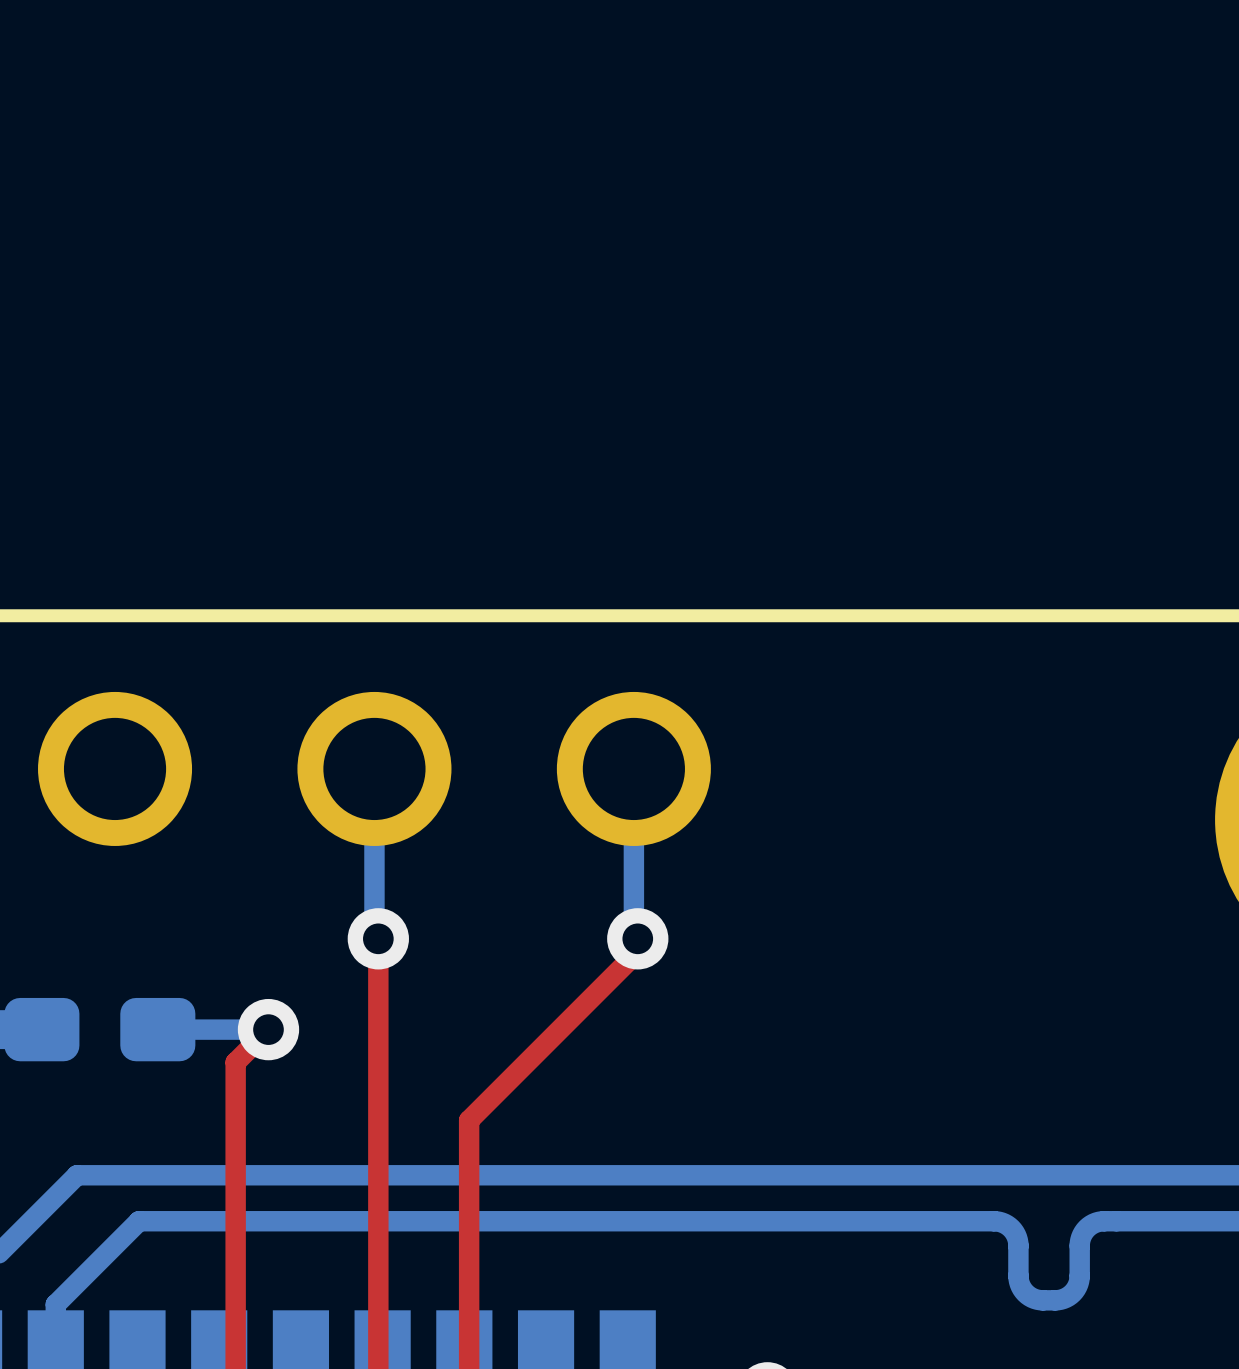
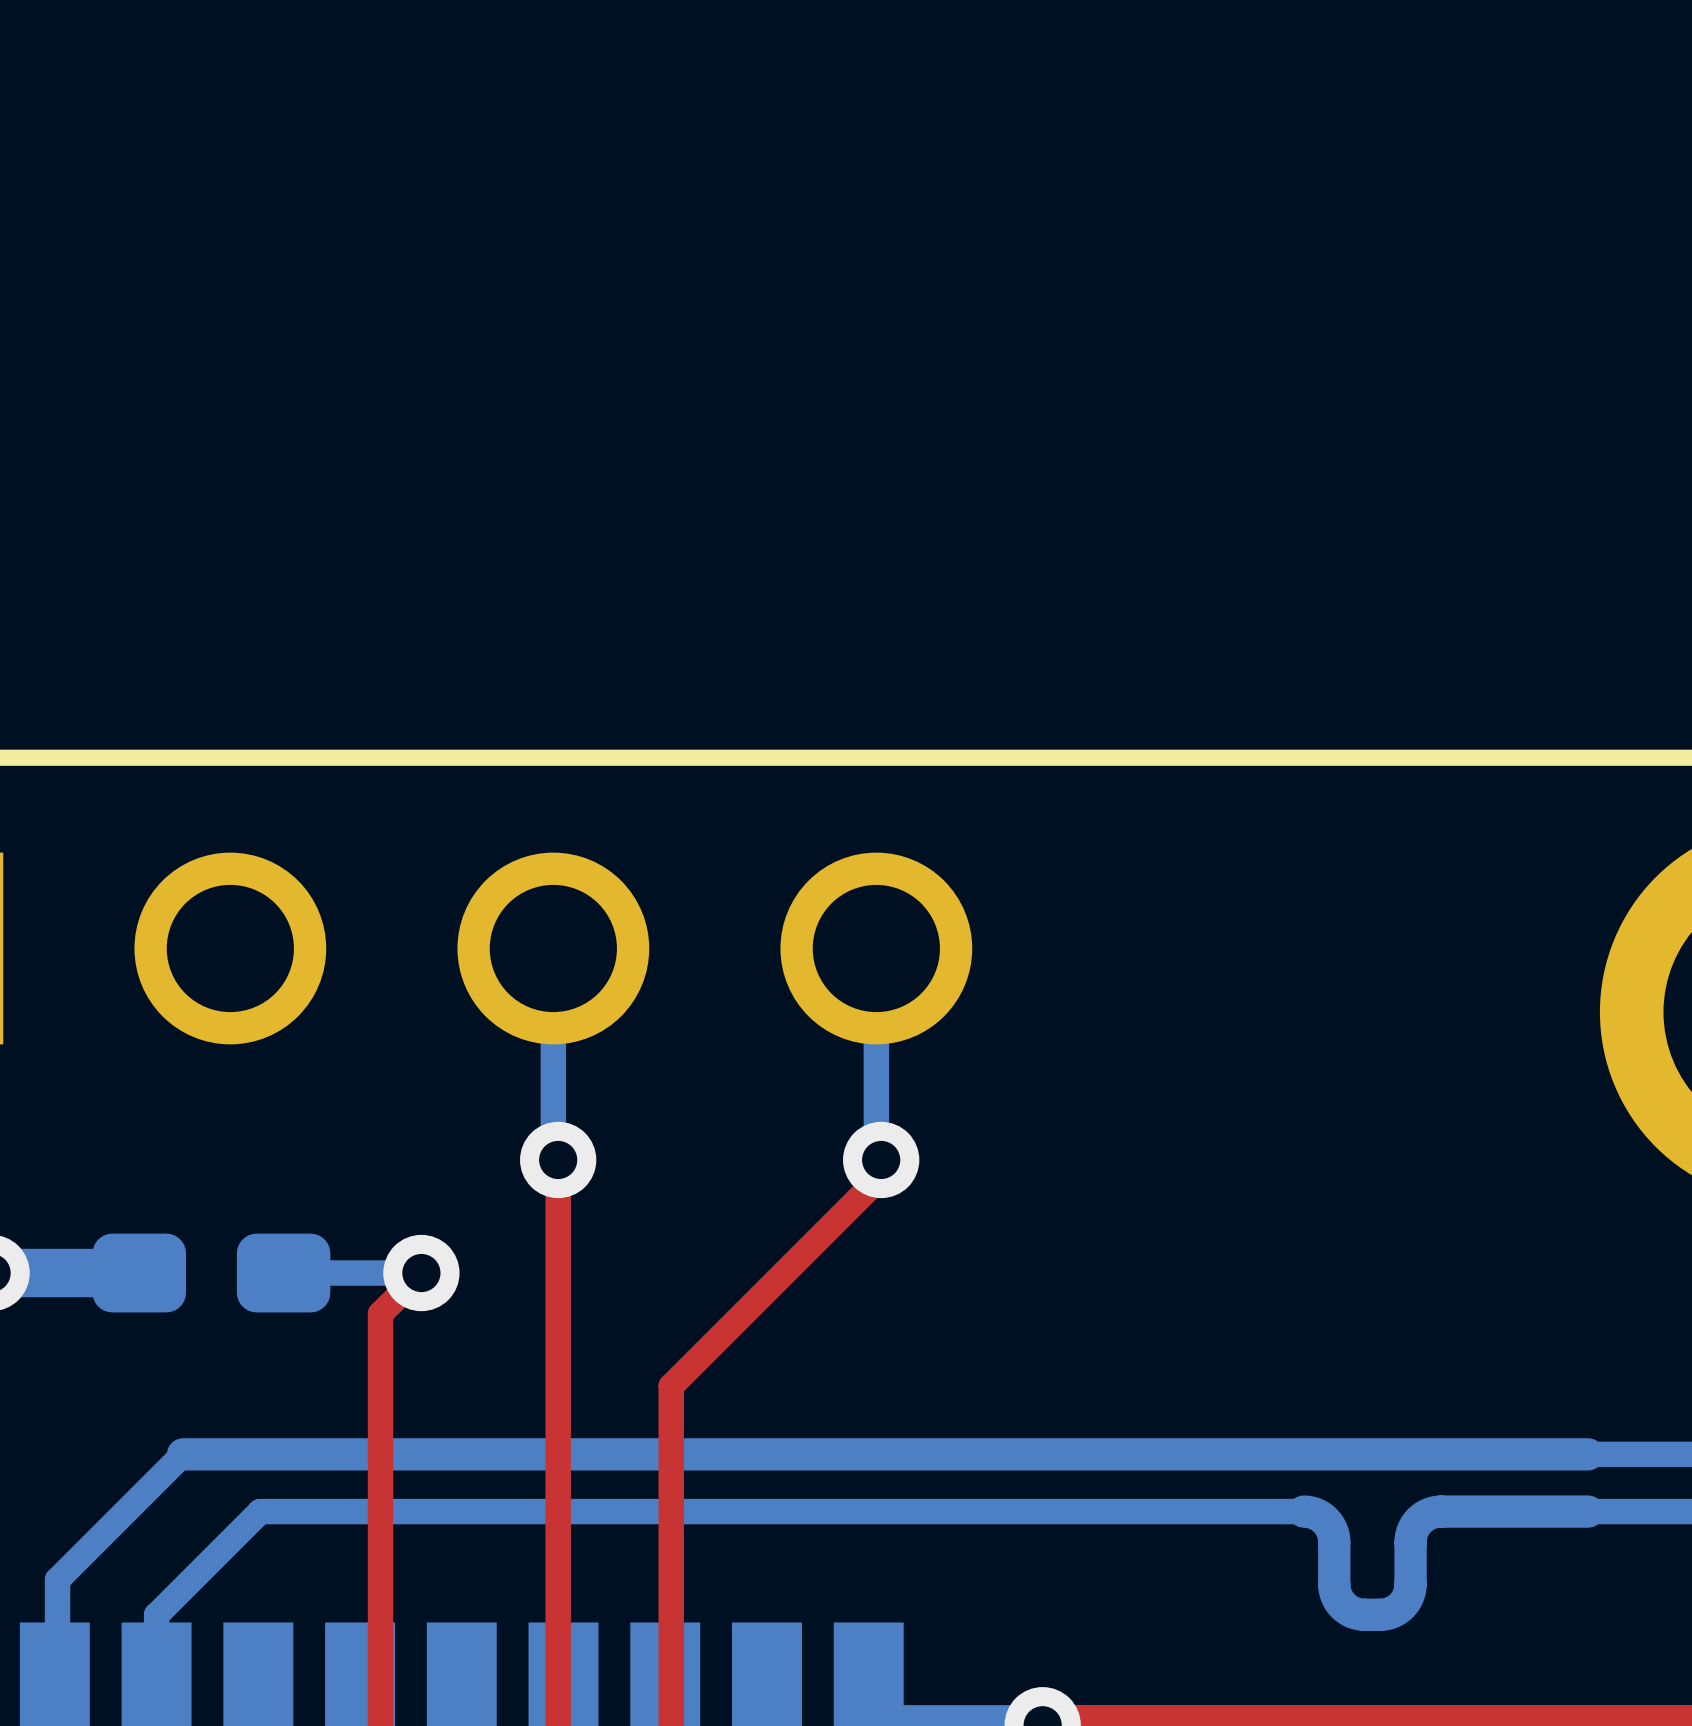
bottom track width: thin (77, 1175) (1205, 1175) -> thick (183, 1454) (1588, 1454)
bottom track: (977, 1221) (999, 1221) (1013, 1230) (1018, 1243) (1018, 1278) (1020, 1286) (1029, 1296) (1042, 1300) (1063, 1298) (1074, 1291) (1079, 1278) (1079, 1243) (1082, 1235) (1091, 1224) (1104, 1221) -> (1303, 1511) (1319, 1516) (1329, 1525) (1334, 1538) (1335, 1594) (1340, 1603) (1348, 1610) (1364, 1614) (1390, 1613) (1399, 1608) (1405, 1600) (1410, 1587) (1411, 1535) (1419, 1520) (1434, 1512) (1461, 1511)
bottom track width: thin (1104, 1221) (1205, 1221) -> thick (1461, 1511) (1588, 1511)

